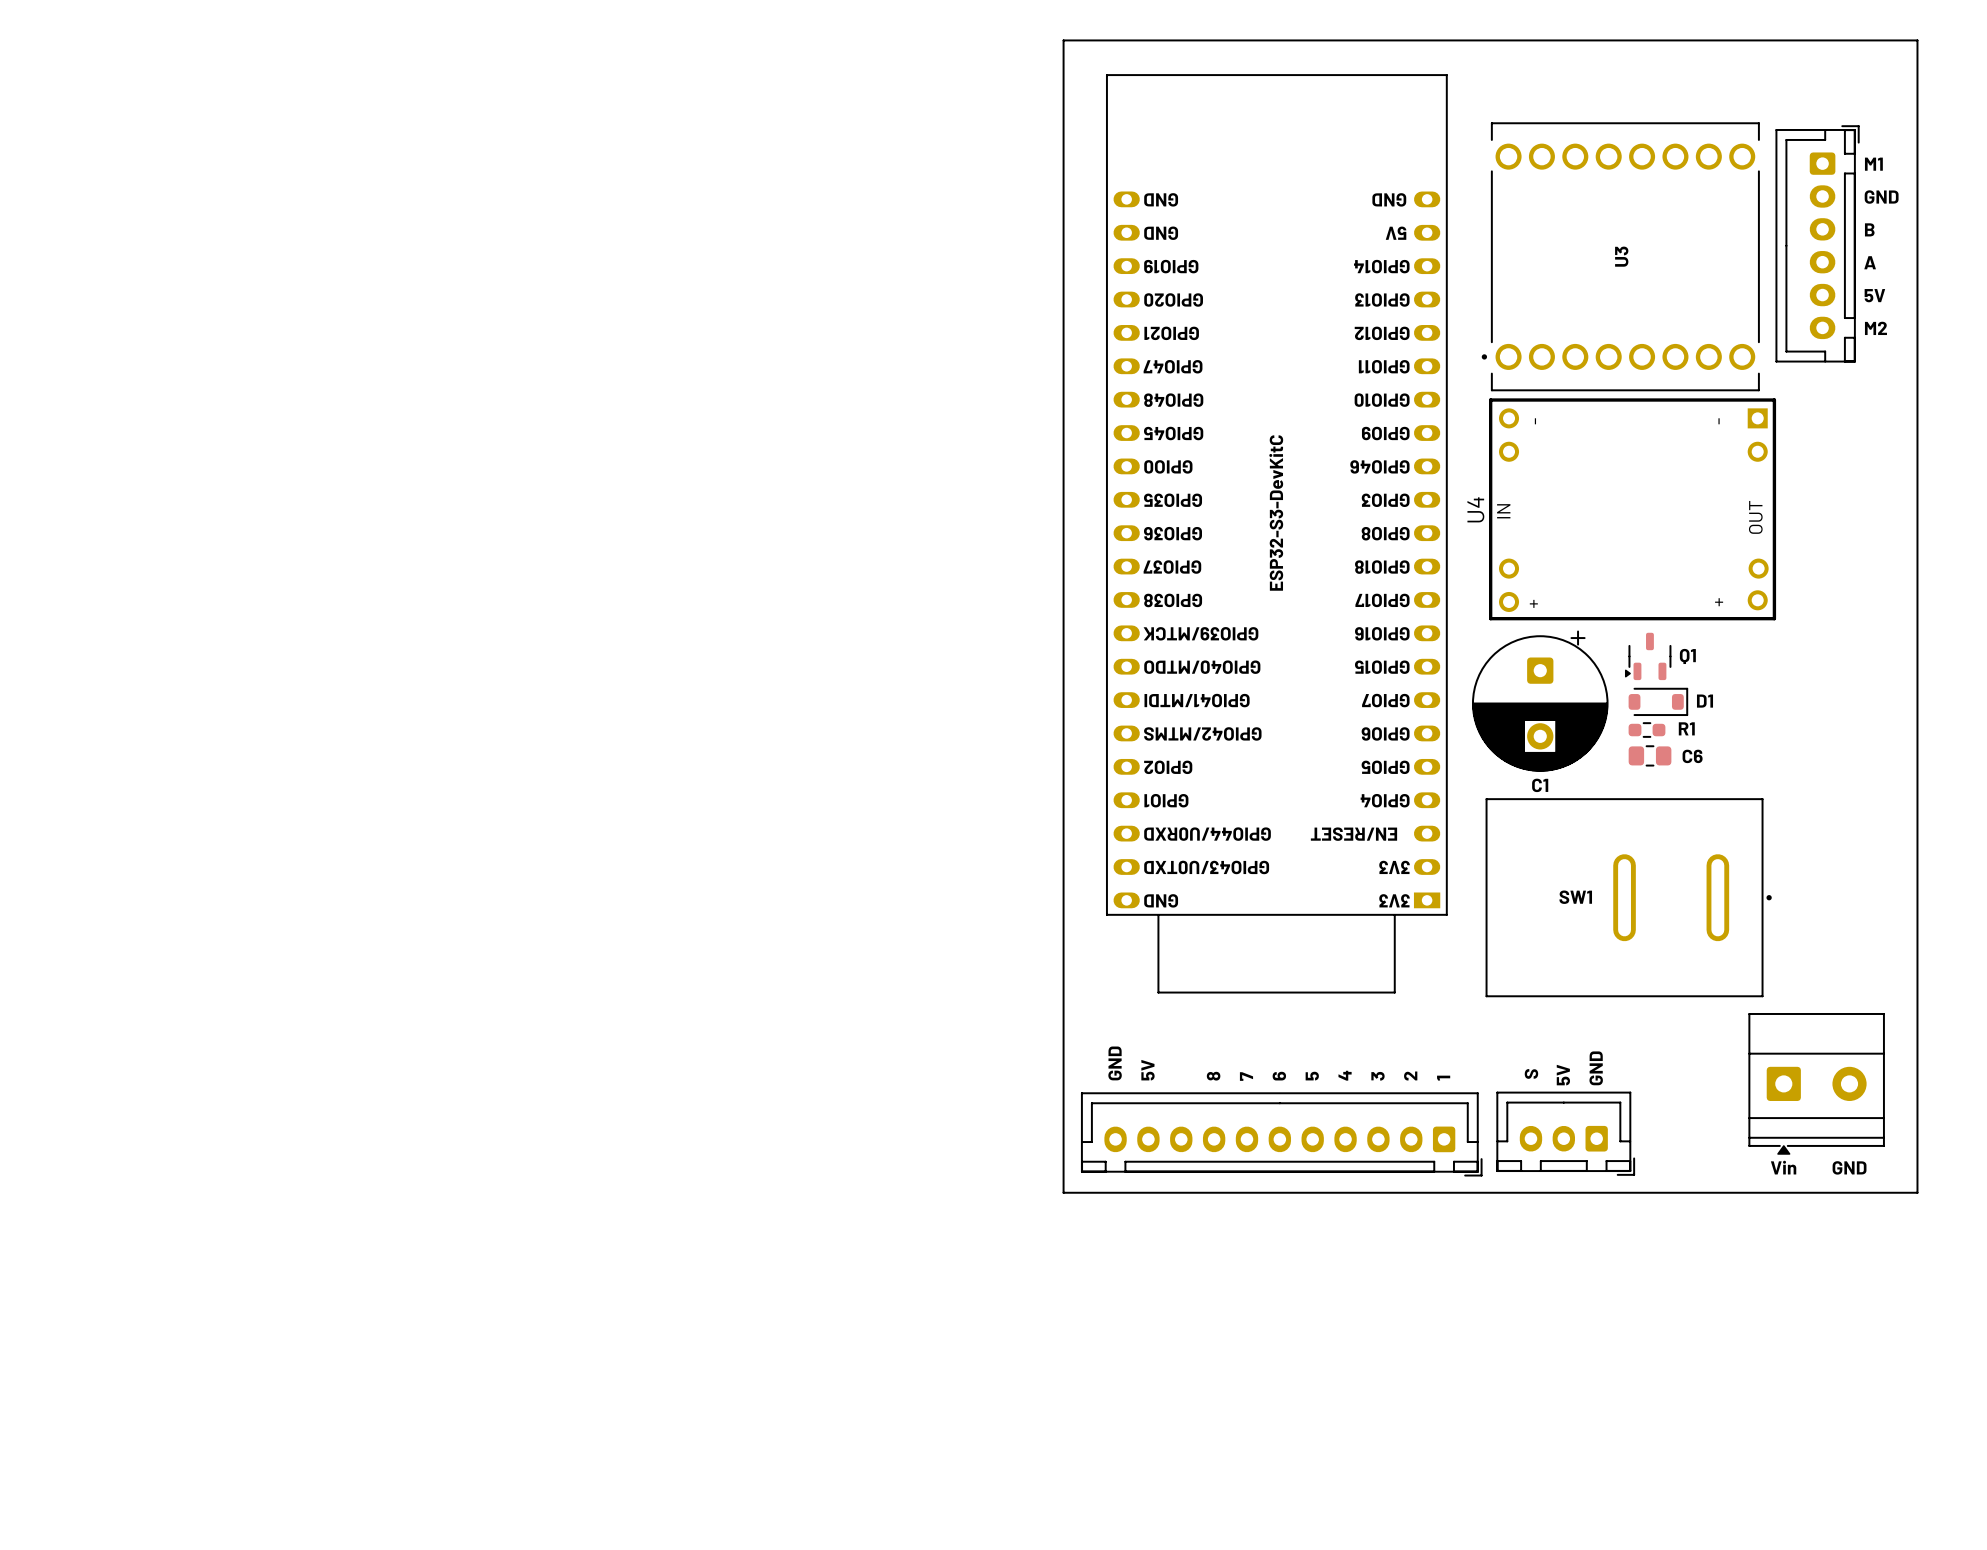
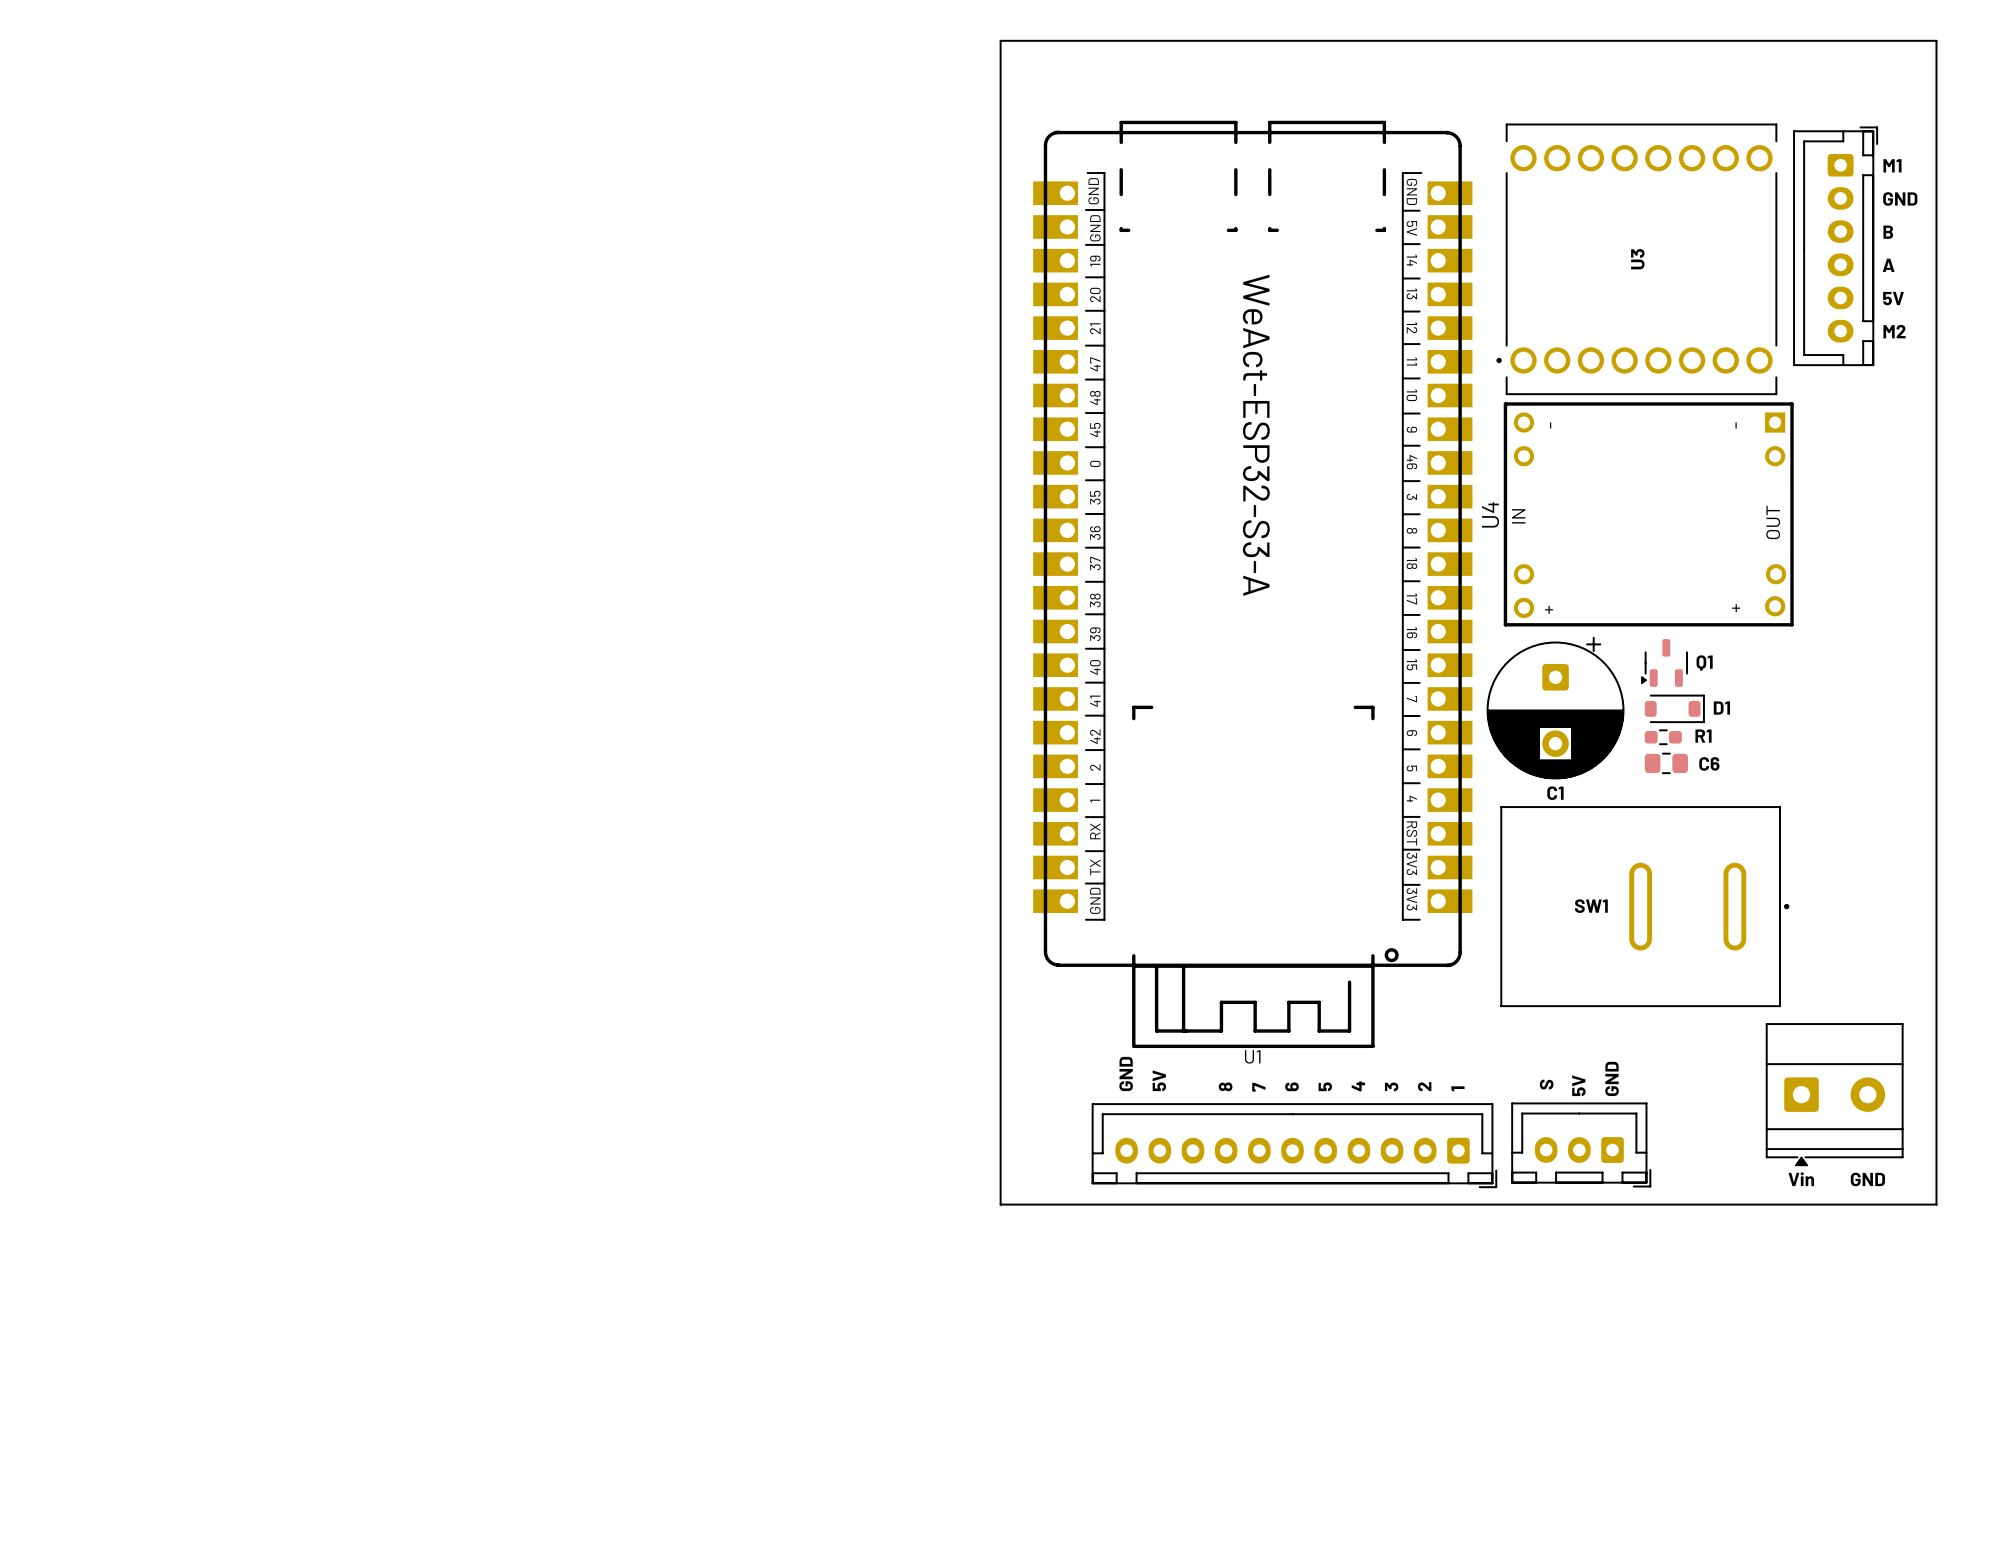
board edge: (1063, 40) (1063, 1192) -> (1074, 40) (1000, 40) (1000, 1204) (1074, 1204)
part: ESP32-S3-DevKitC (1276, 533) -> none
U1: none -> (1252, 584)

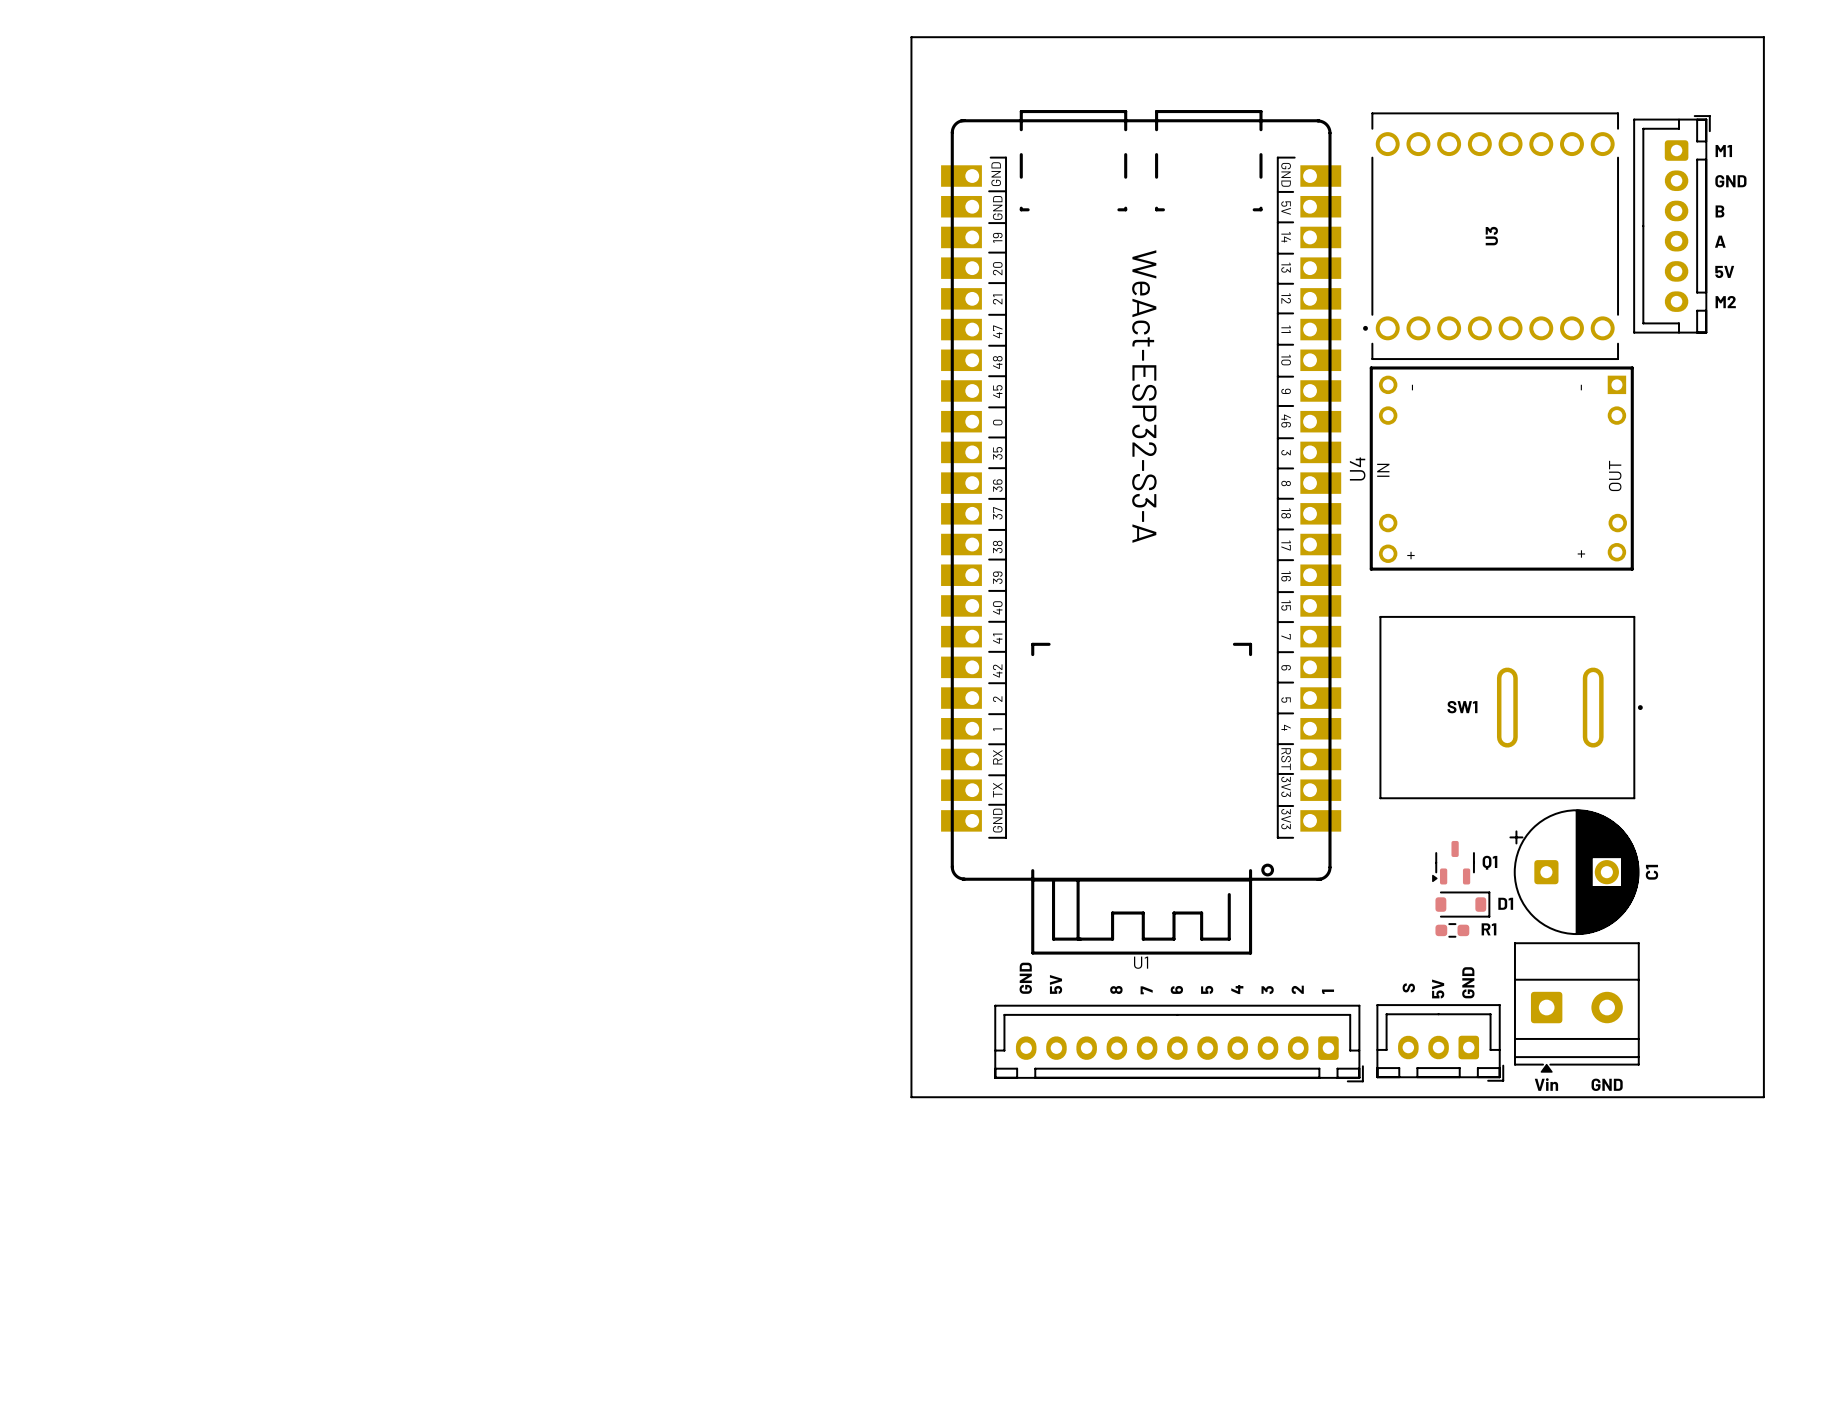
Q1 position: (1664, 662) -> (1453, 862)
C1 rotation: 0° (1555, 708) -> 90° counterclockwise (1574, 872)
C1 position: (1555, 708) -> (1574, 872)
D1 position: (1674, 708) -> (1462, 904)
R1 position: (1663, 737) -> (1452, 930)
C6: (1666, 763) -> none
SW1 position: (1644, 906) -> (1511, 707)
part position: (1834, 1094) -> (1576, 1007)

